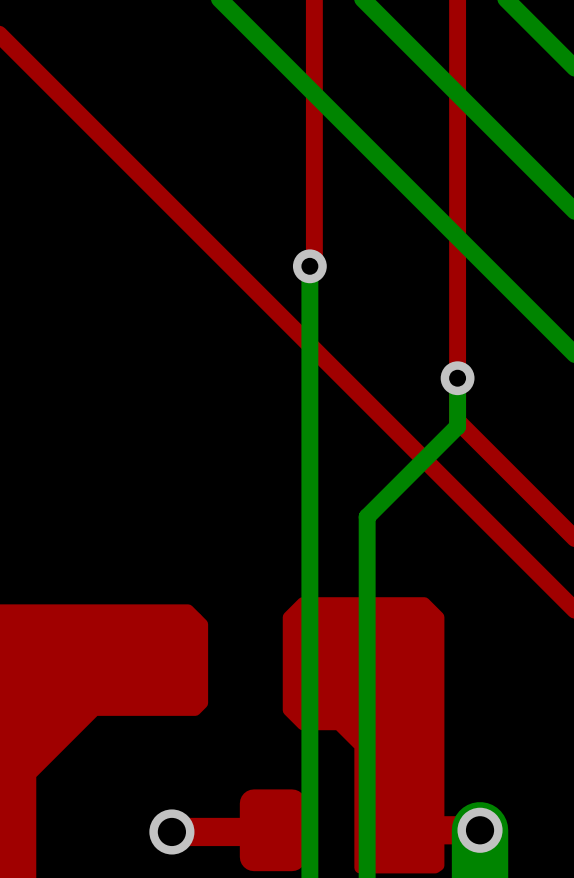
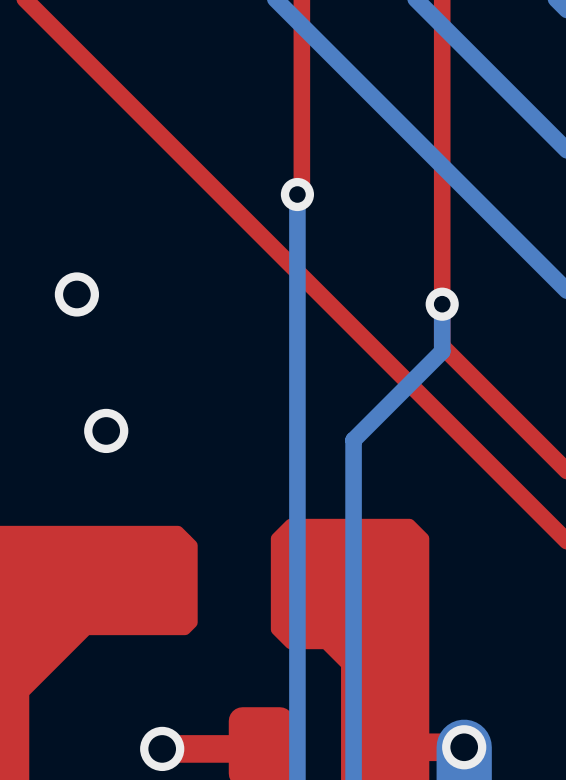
via: none -> (76, 294)
via: none -> (106, 430)

